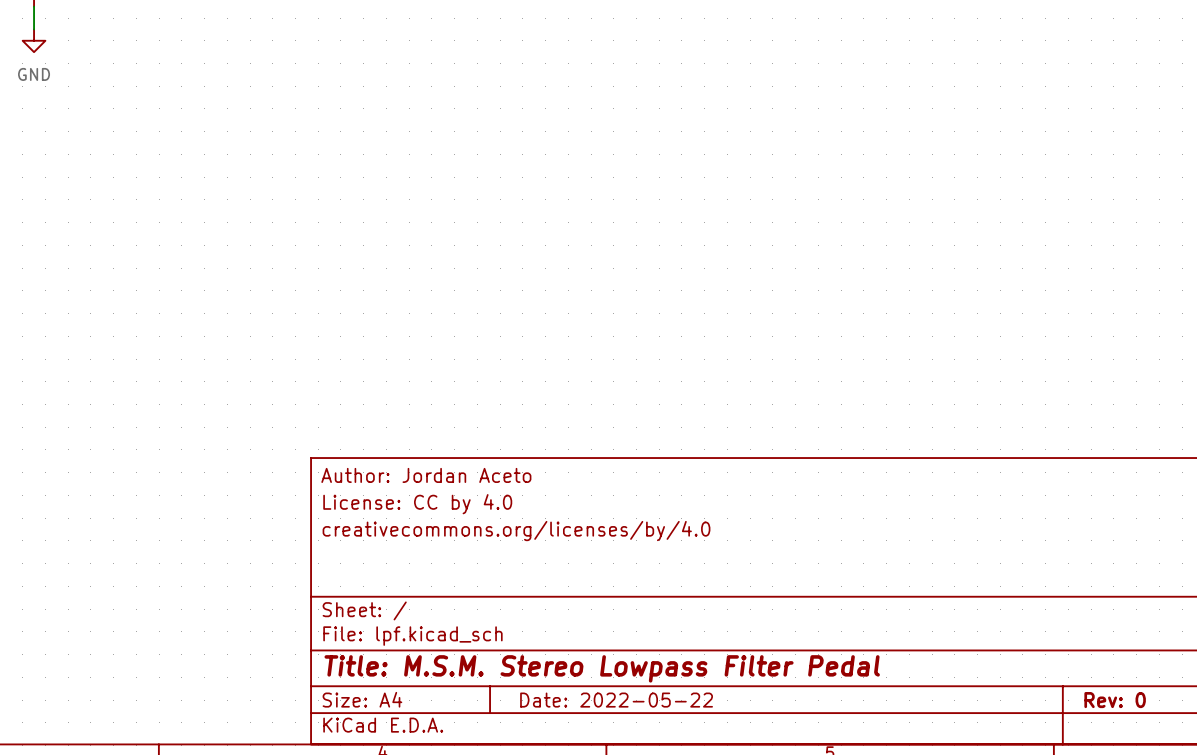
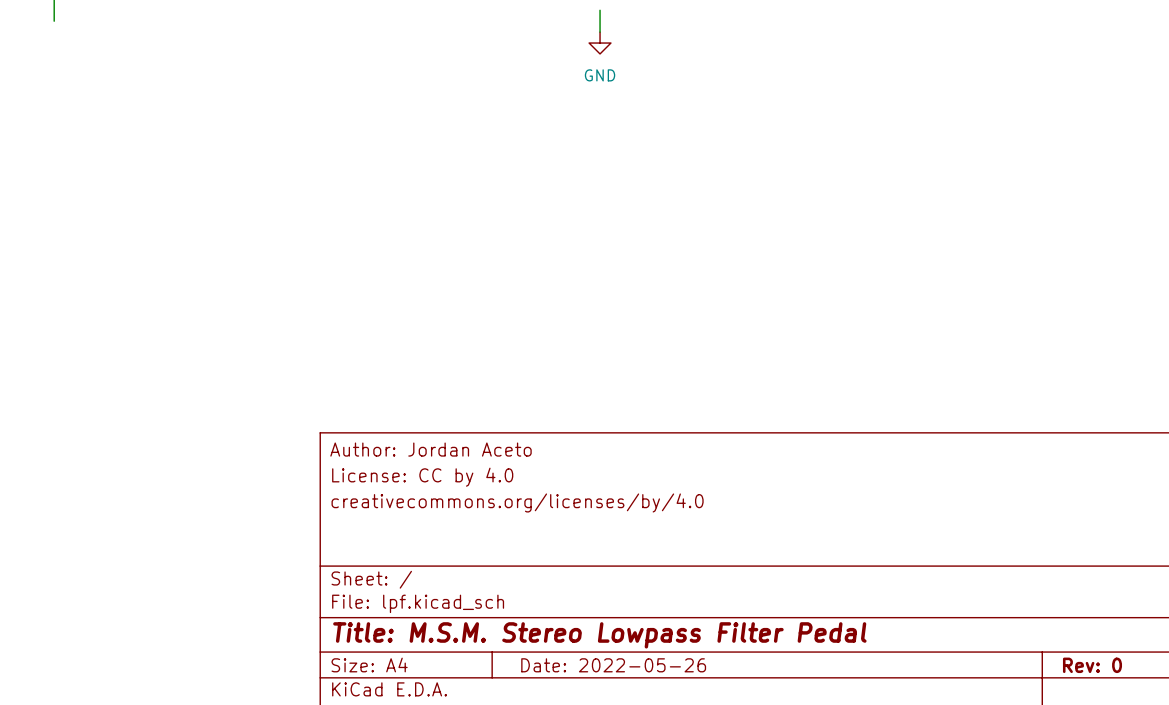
wire: none -> (600, 10) (600, 32)
power symbol: GND (34, 40) -> none
power symbol: none -> GND (600, 43)
title block: Date: 2022-05-22 (616, 700) -> Date: 2022-05-26 (613, 665)

